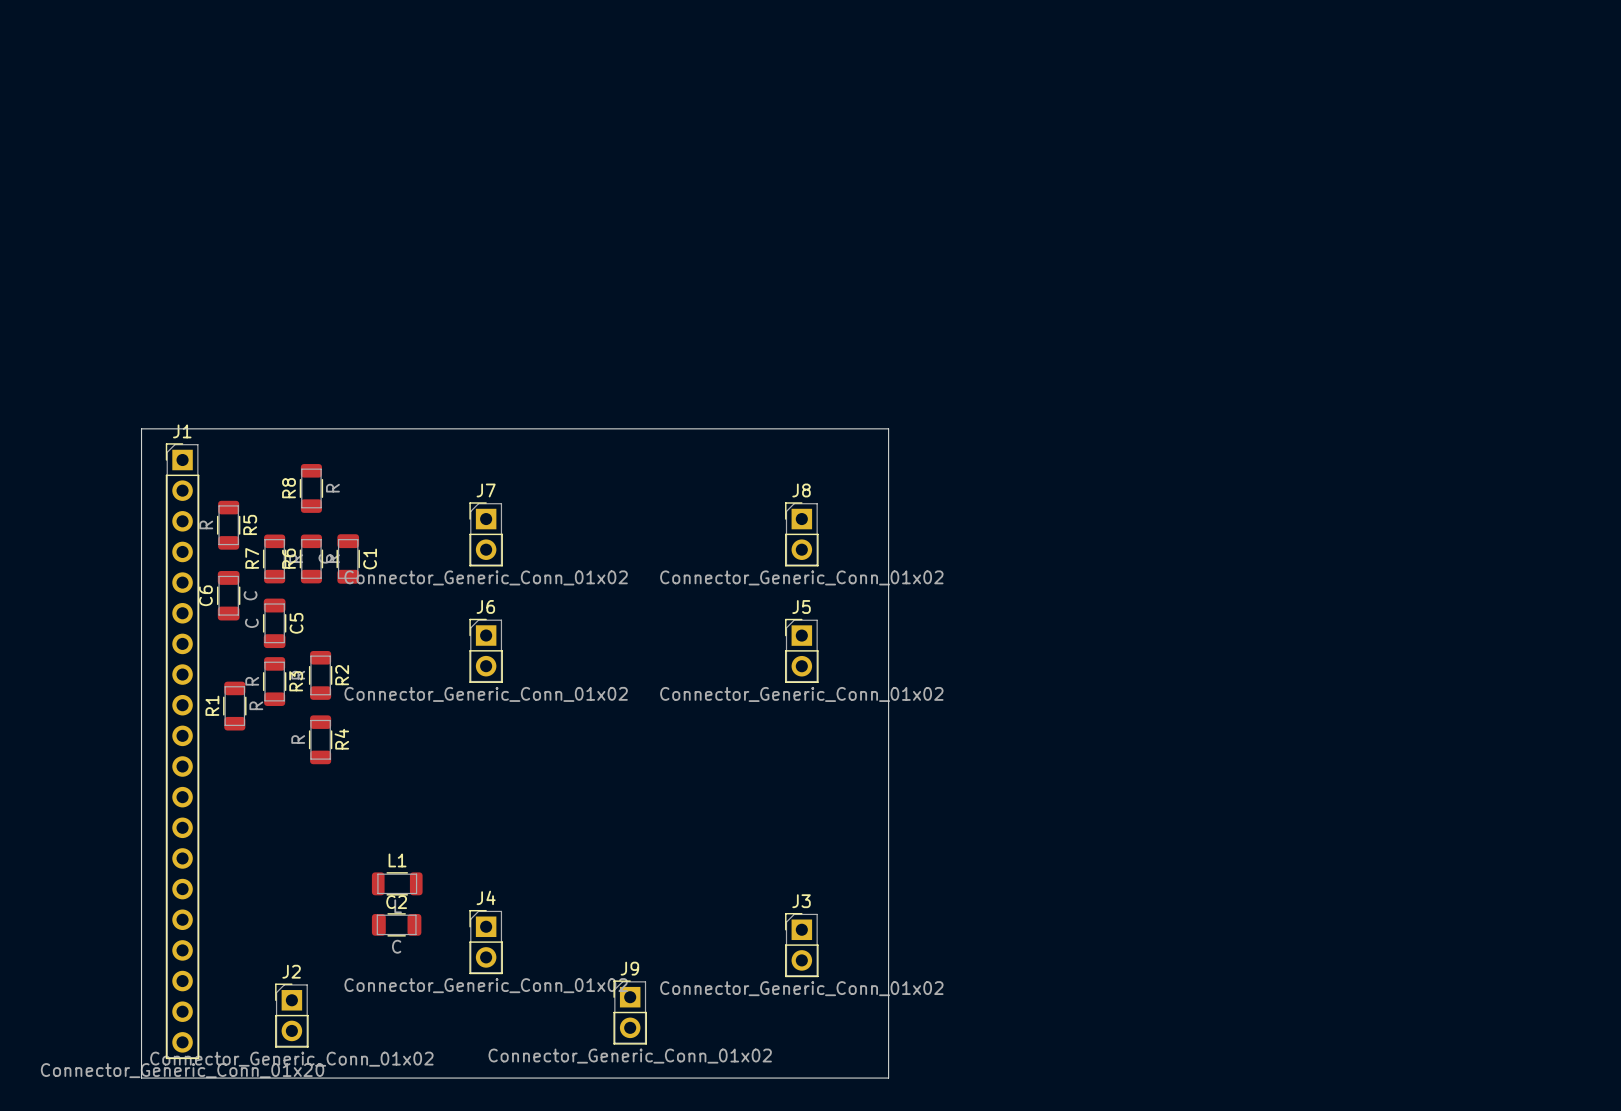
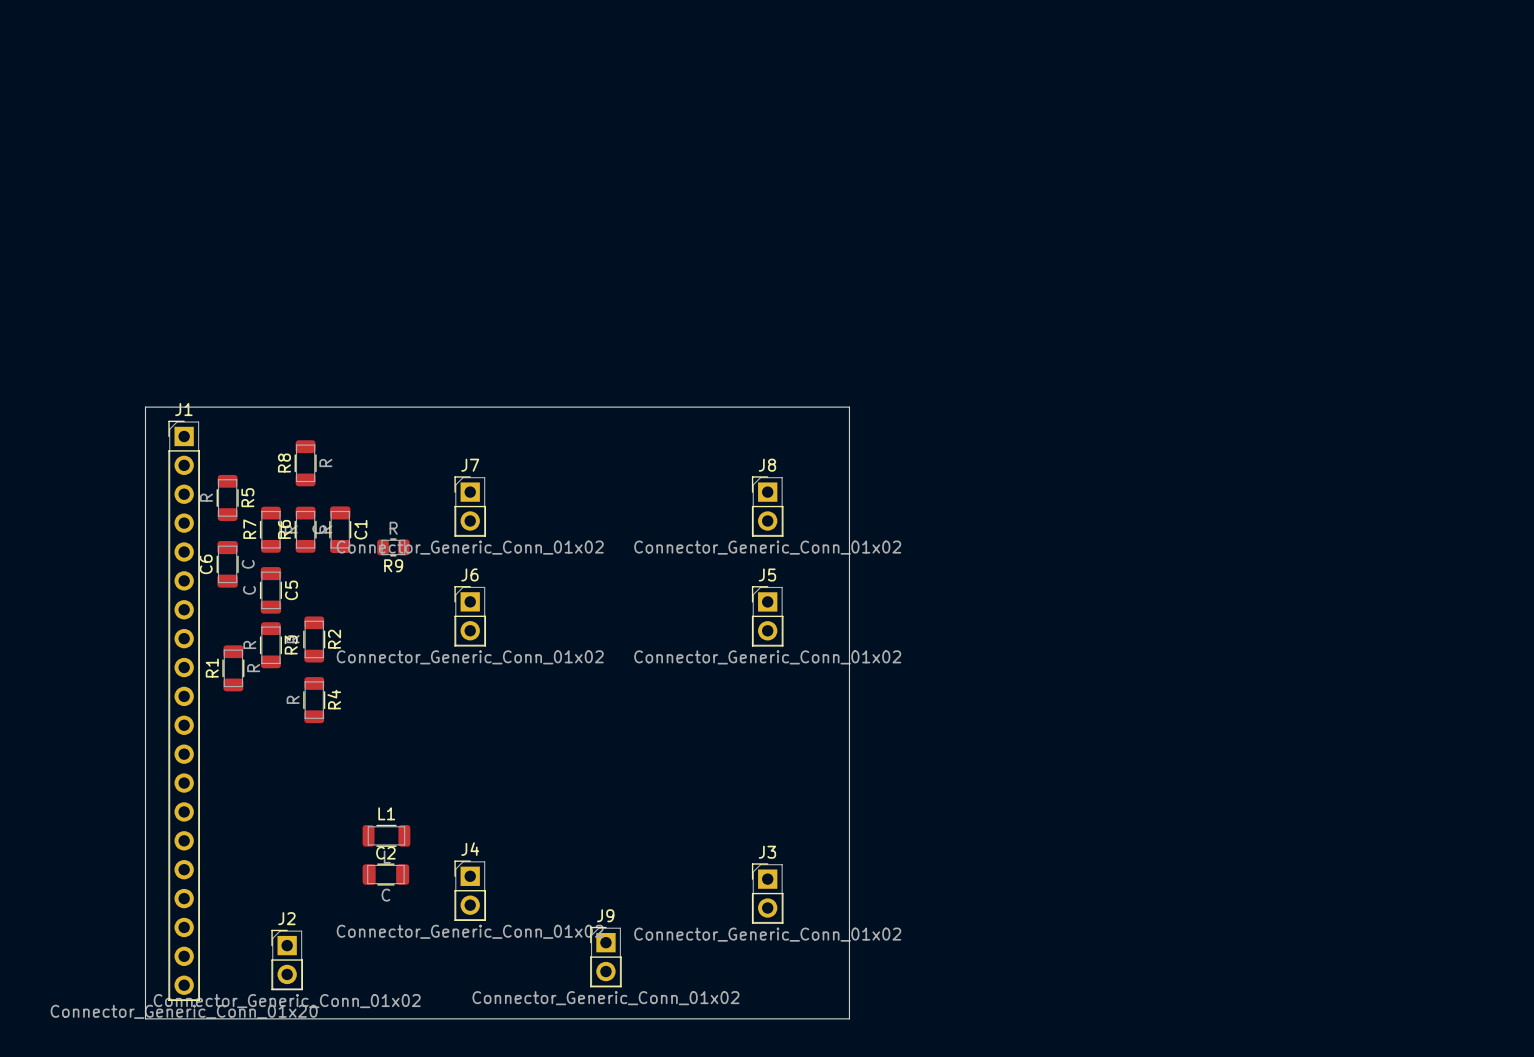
R9: none -> R (393, 547)

